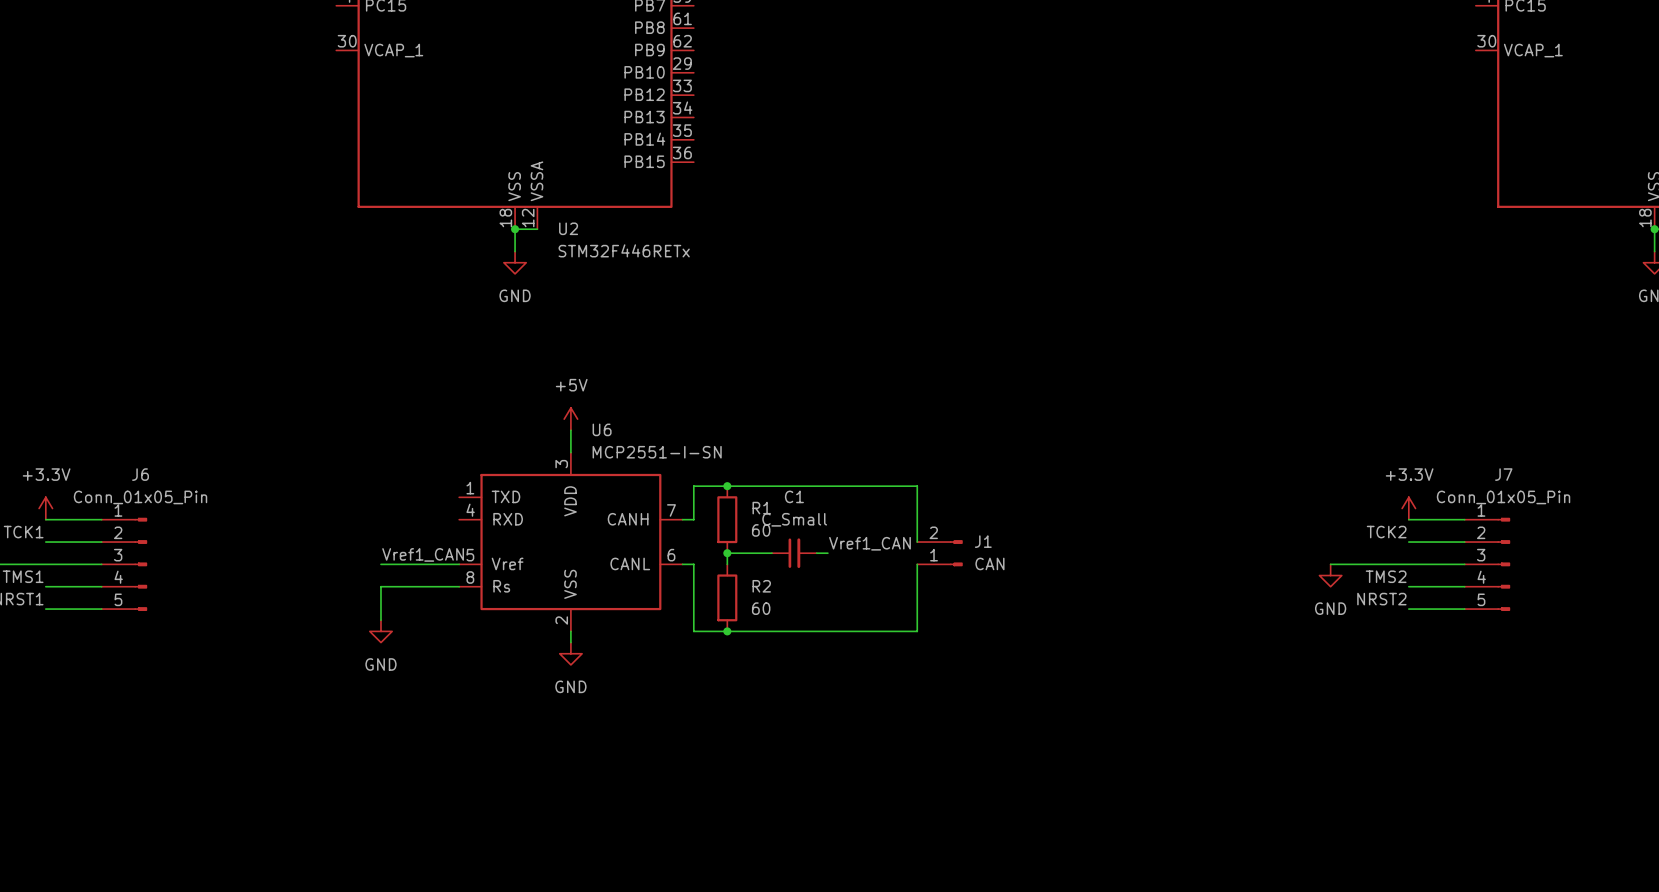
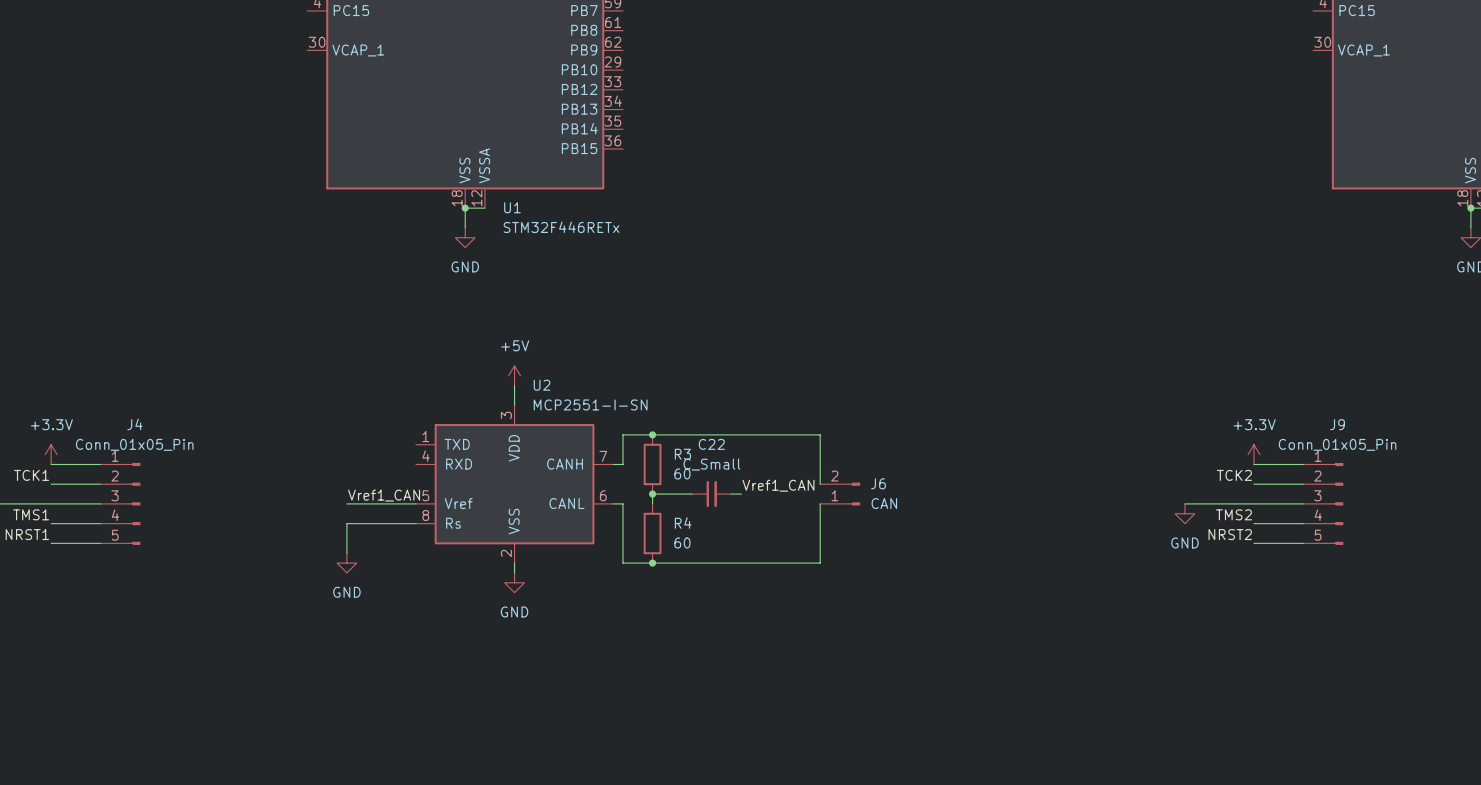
U2 name: U2 (568, 228) -> U1 (512, 207)
U6 name: U6 (602, 429) -> U2 (542, 385)
J6 name: J6 (140, 474) -> J4 (134, 424)
J7 name: J7 (1503, 474) -> J9 (1337, 424)
C1 name: C1 (794, 496) -> C22 (711, 444)
R1 name: R1 (761, 508) -> R3 (682, 454)
J1 name: J1 (983, 541) -> J6 (878, 483)
R2 name: R2 (761, 586) -> R4 (683, 523)

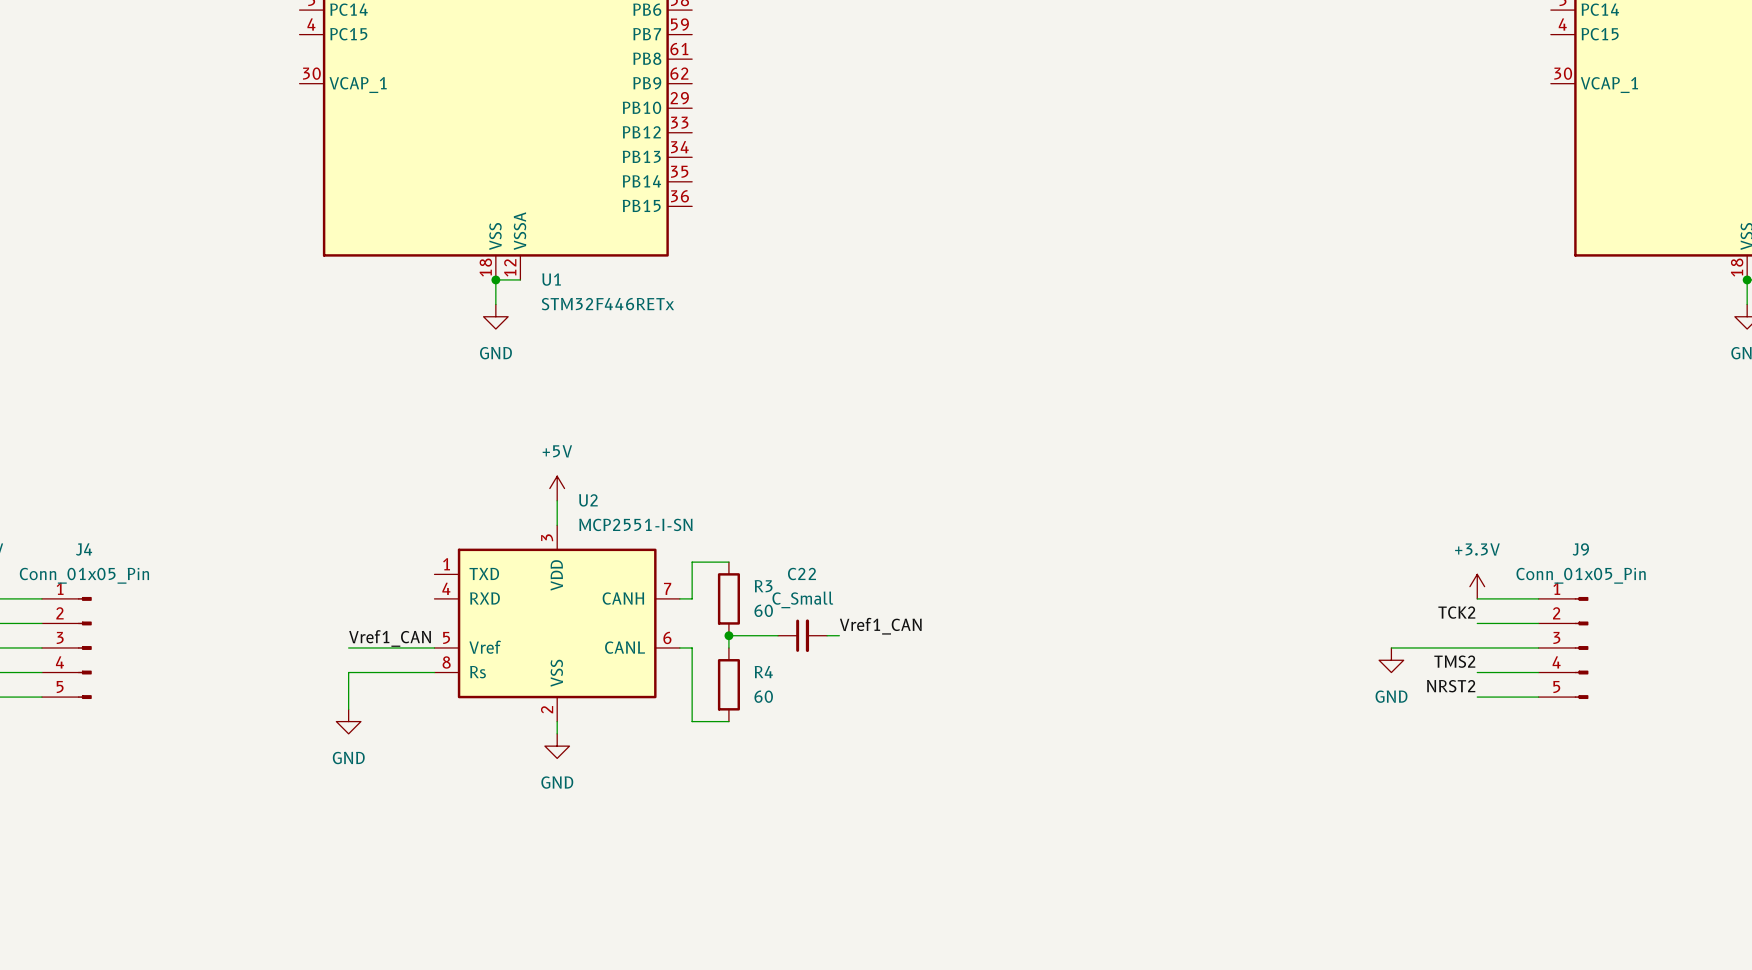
wire: (652, 434) (820, 434) (820, 484) -> none
junction: (652, 434) -> none
J6: CAN (840, 494) -> none
wire: (820, 503) (820, 563) (652, 563) -> none
junction: (652, 563) -> none

